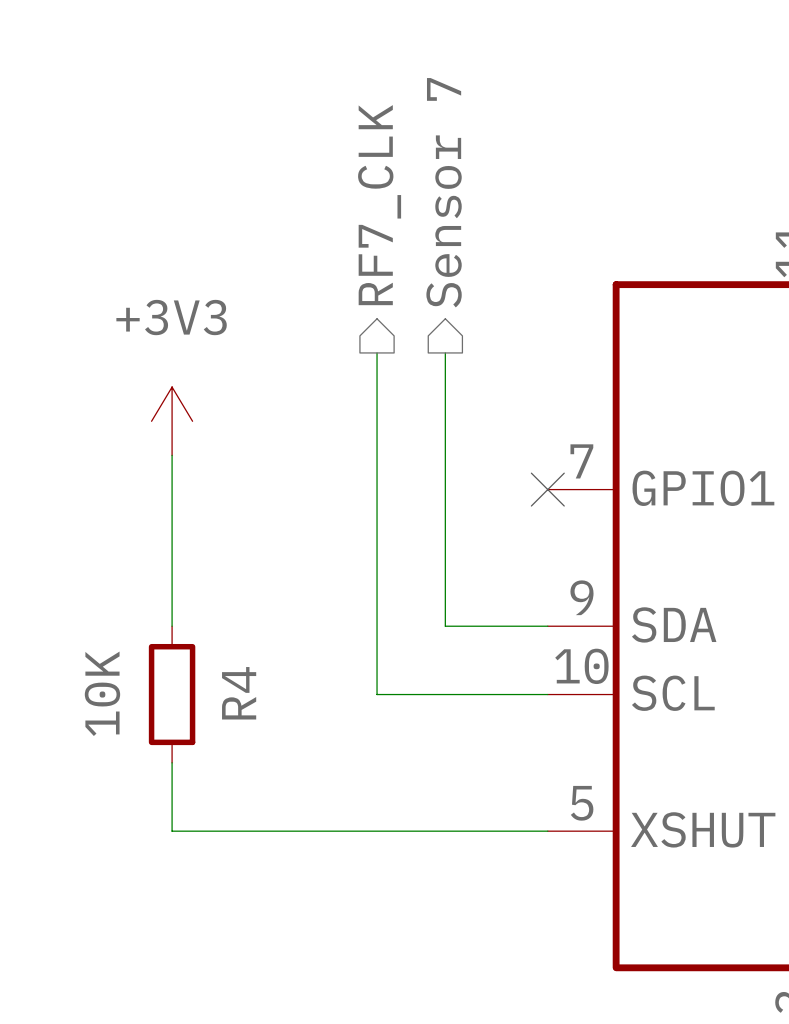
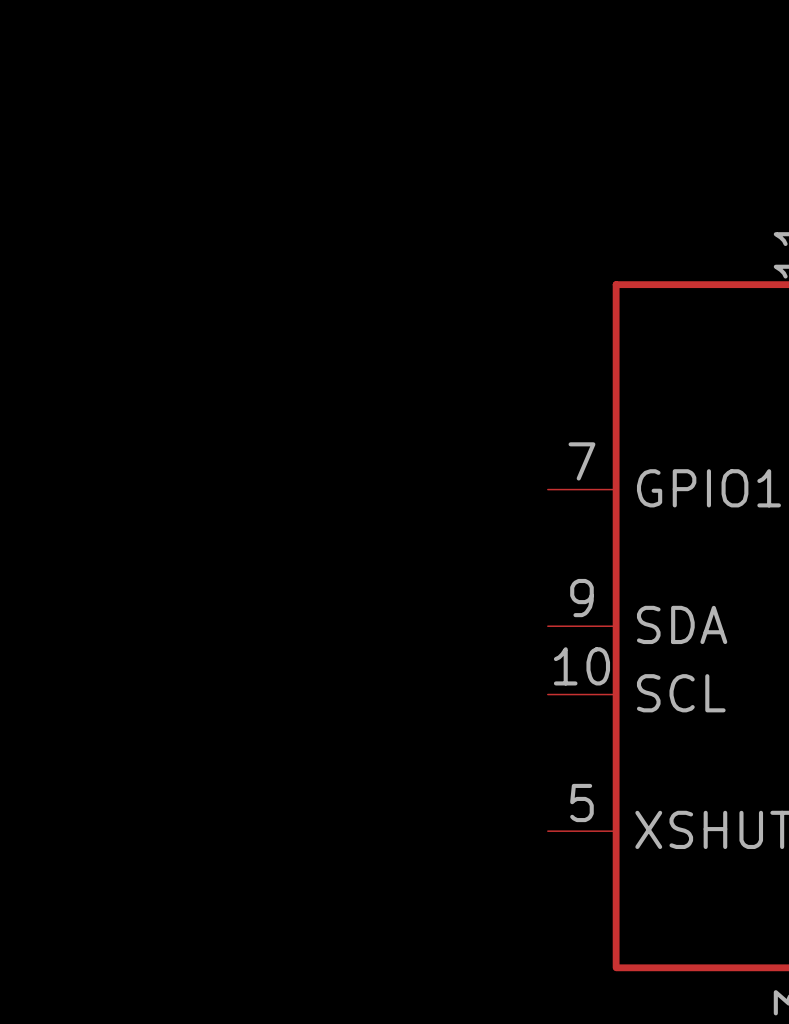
hierarchical label: Sensor 7 (444, 192) -> none
hierarchical label: RF7_CLK (379, 205) -> none
wire: (377, 352) (377, 694) (547, 694) -> none
wire: (445, 352) (445, 626) (547, 626) -> none
power symbol: +3V3 (172, 421) -> none
wire: (172, 455) (172, 626) -> none
no-connect mark: (547, 489) -> none
R4: 10K (172, 694) -> none
wire: (172, 762) (172, 831) (547, 831) -> none

